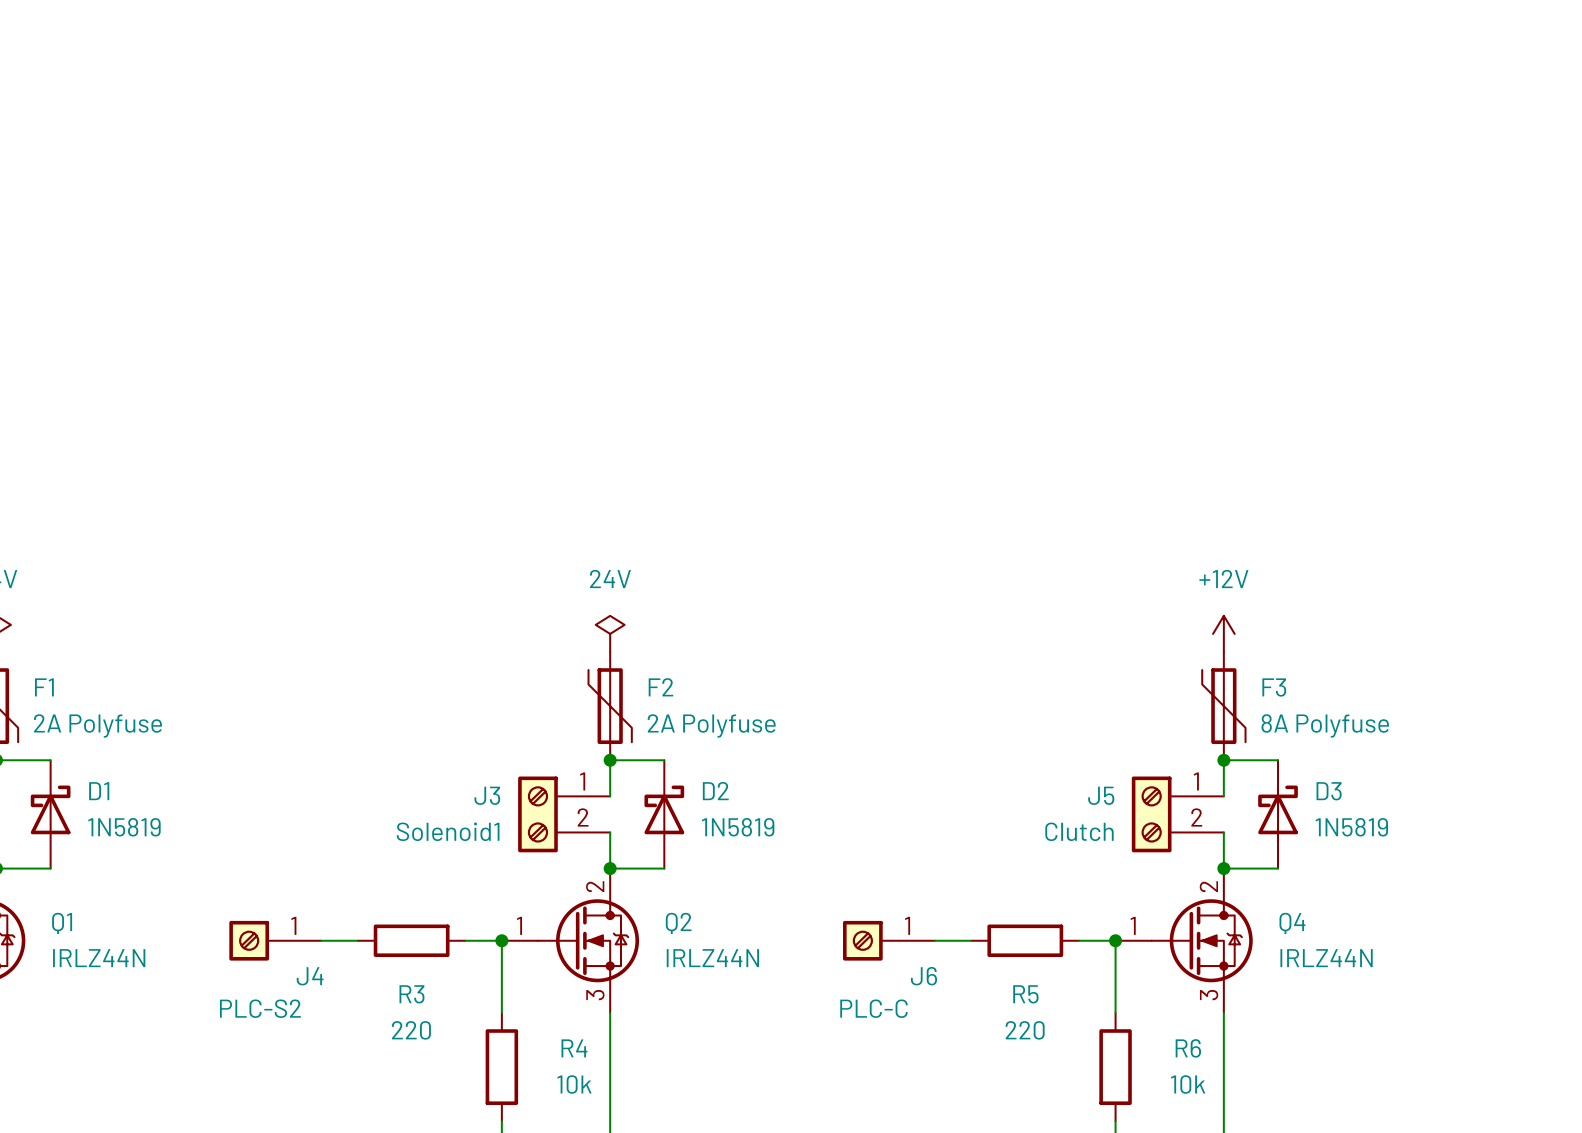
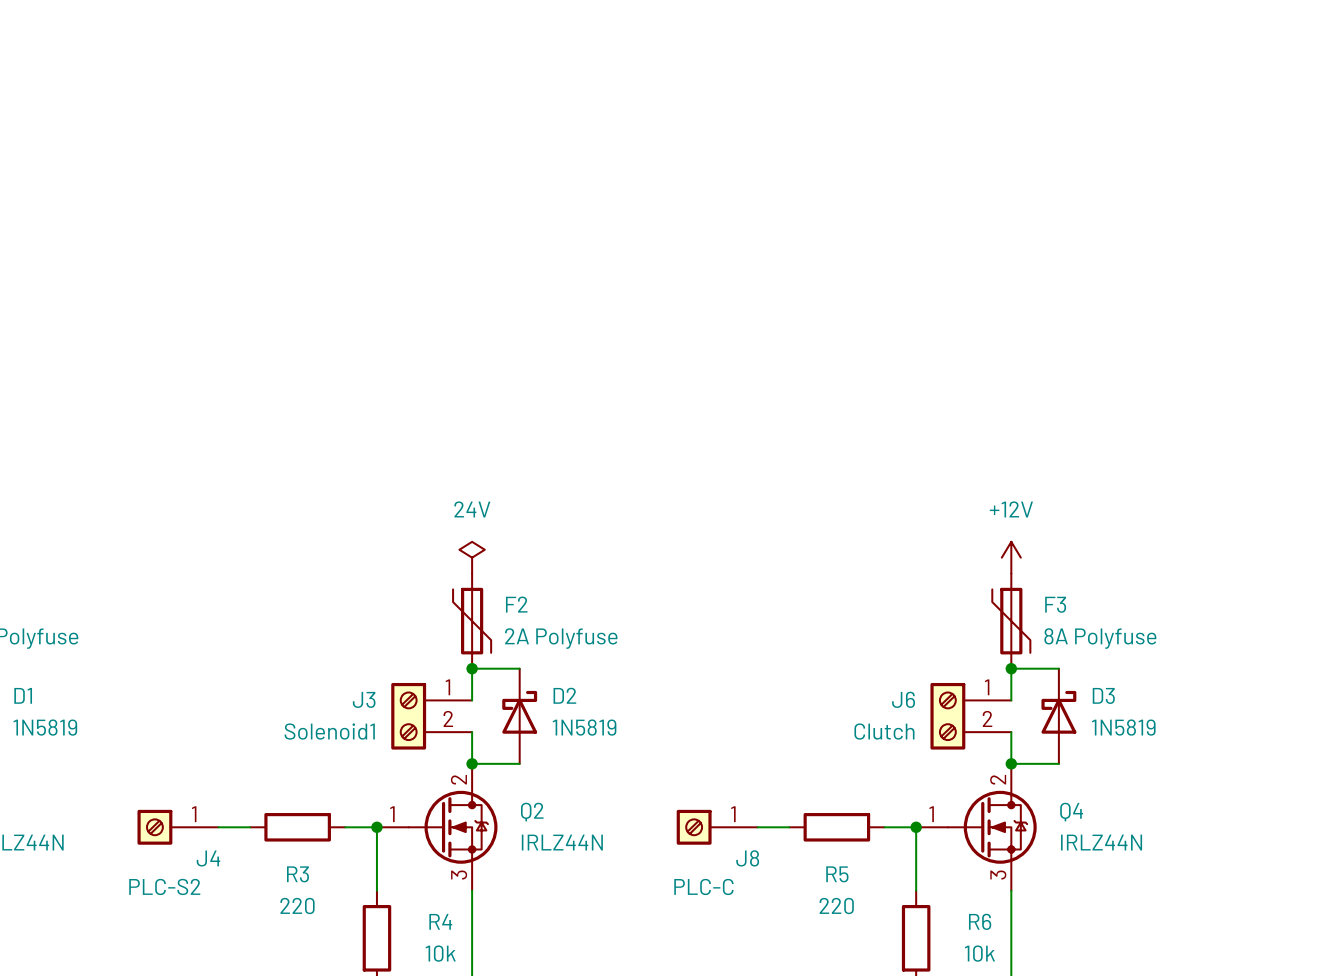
J5 name: J5 (1101, 795) -> J6 (903, 699)
J6 name: J6 (923, 976) -> J8 (747, 858)

